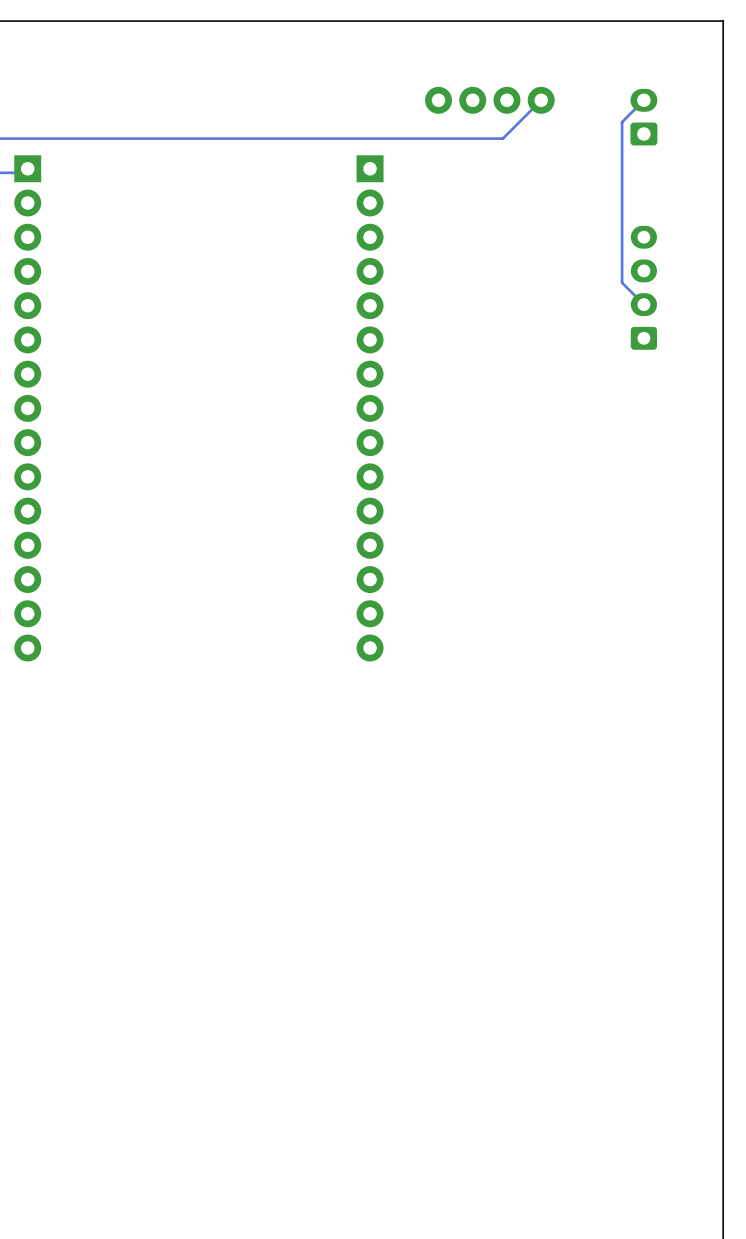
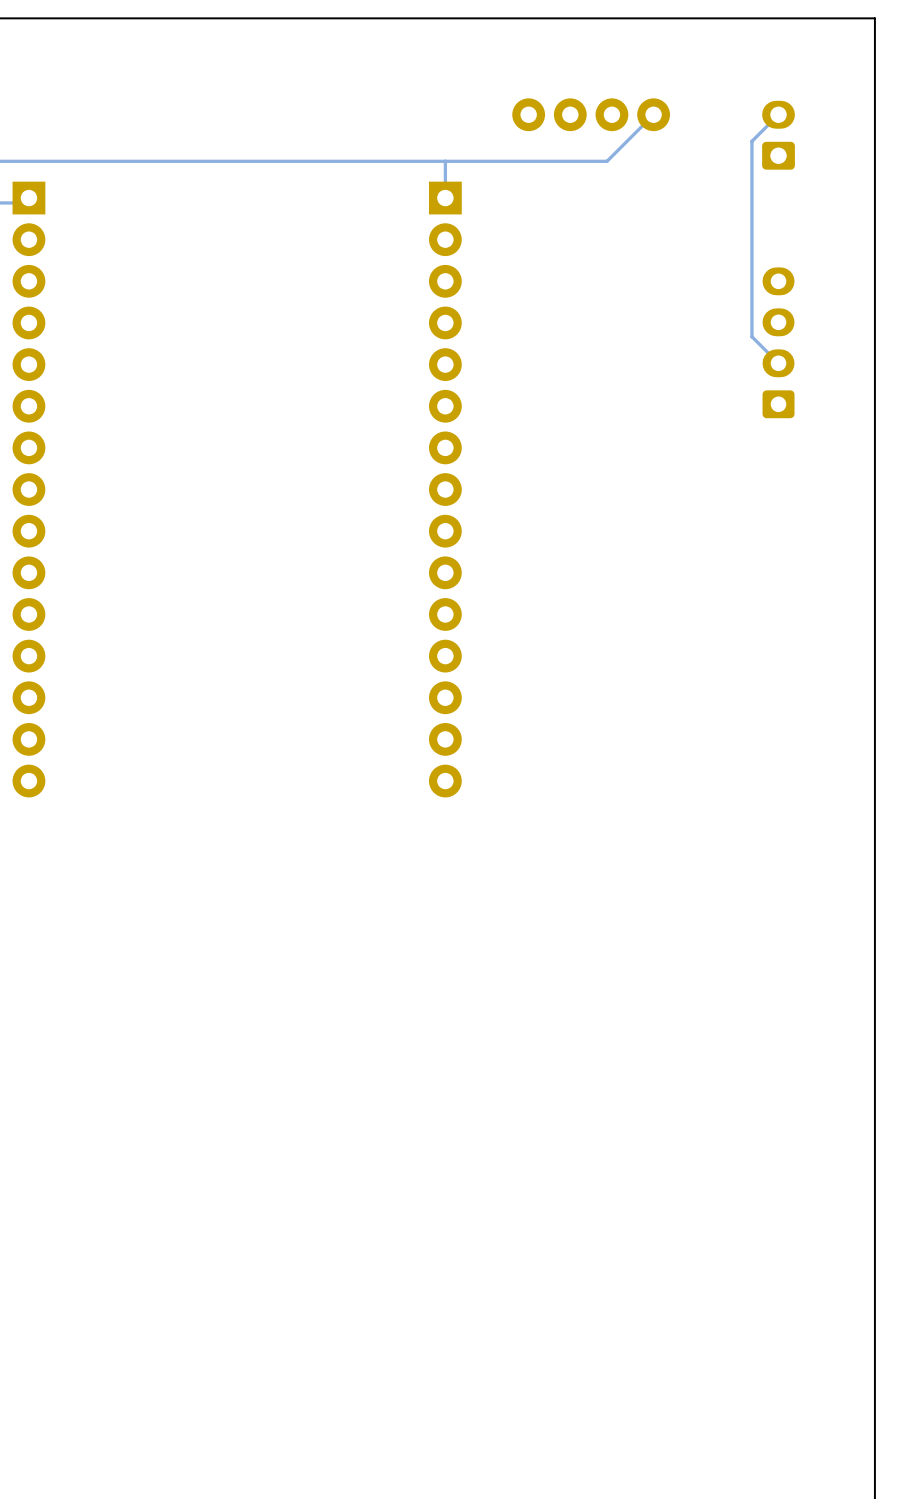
track: none -> (445, 161) (445, 198)

